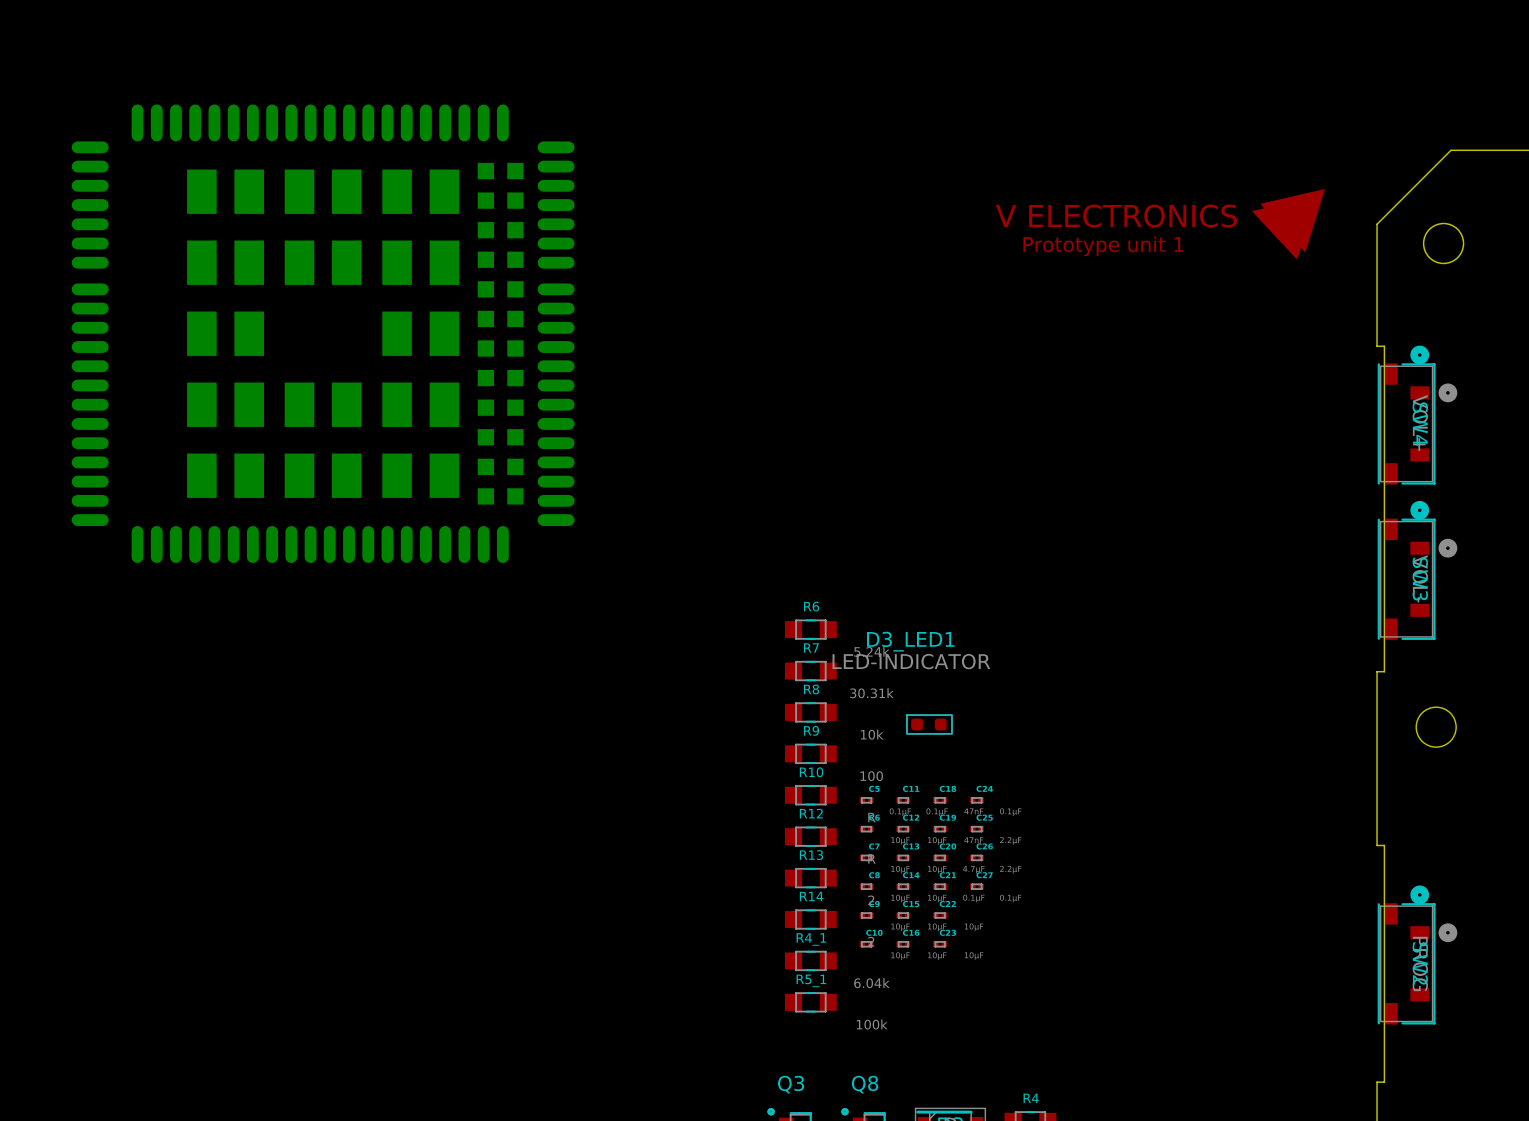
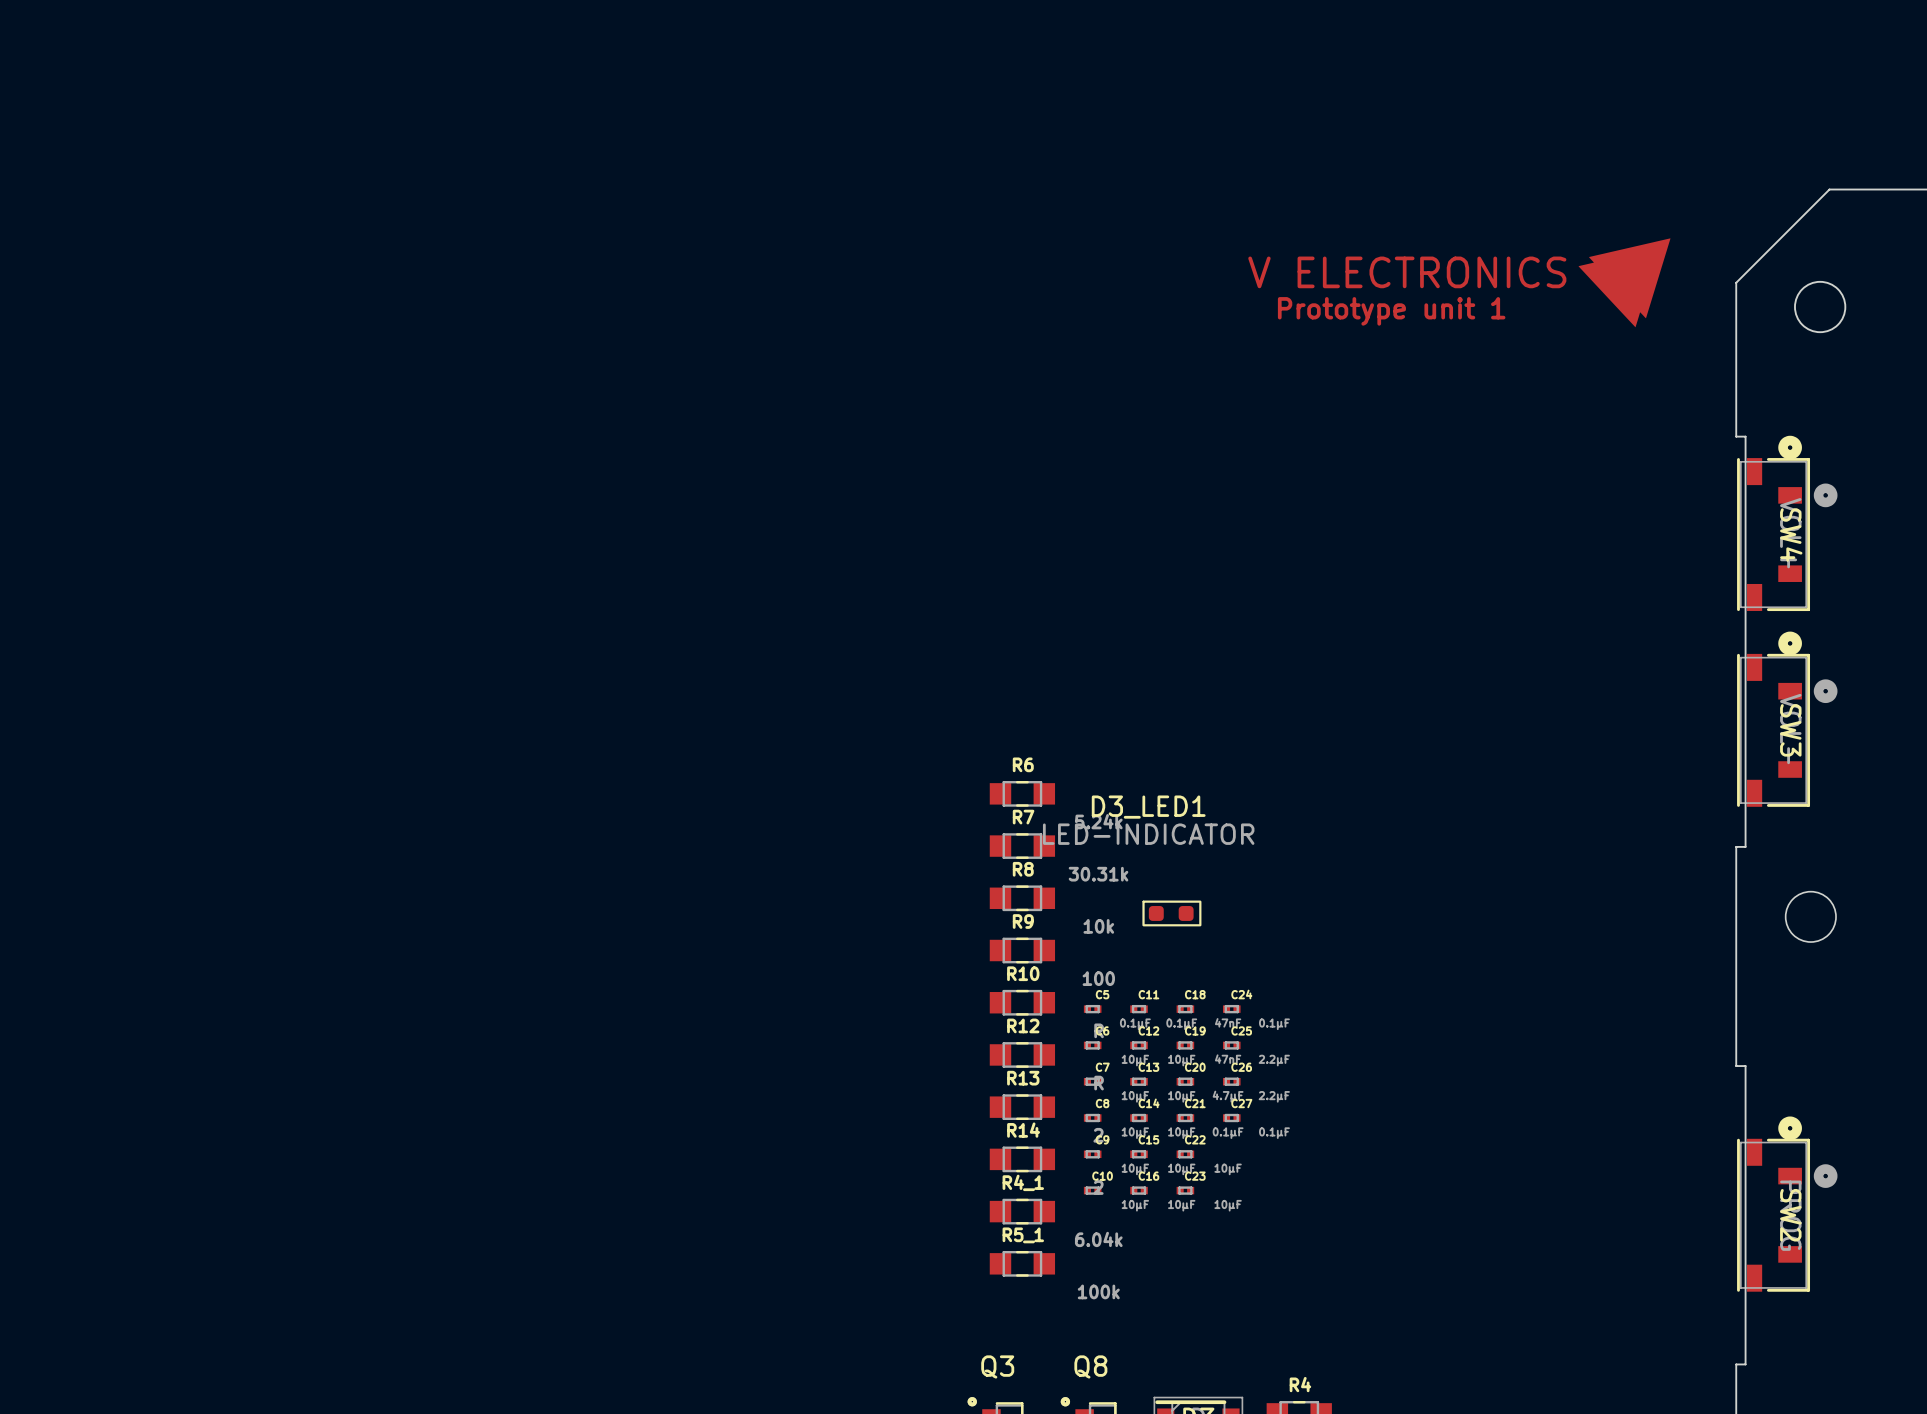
part: (323, 333) -> none

